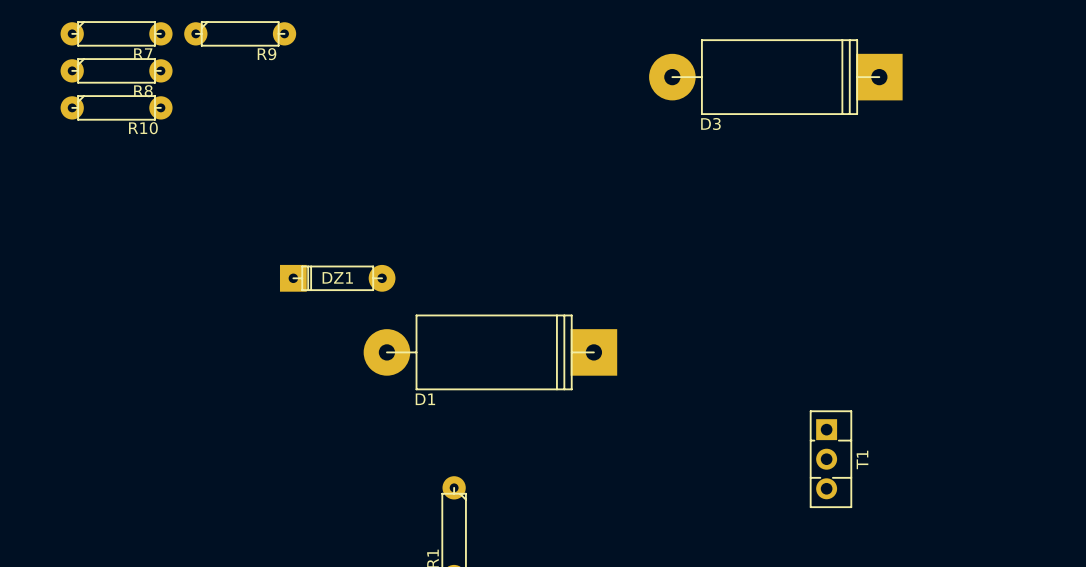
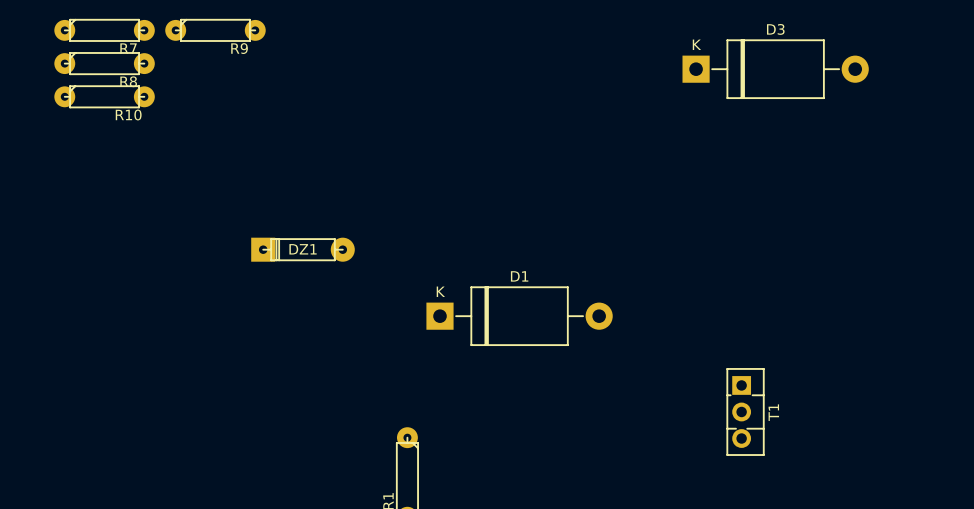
D3 footprint: [649, 39, 903, 115] -> [682, 39, 869, 99]
D3 name position: D3 (710, 123) -> D3 (775, 29)
D1 footprint: [363, 314, 618, 391] -> [426, 286, 613, 346]
D1 name position: D1 (425, 399) -> D1 (519, 276)

